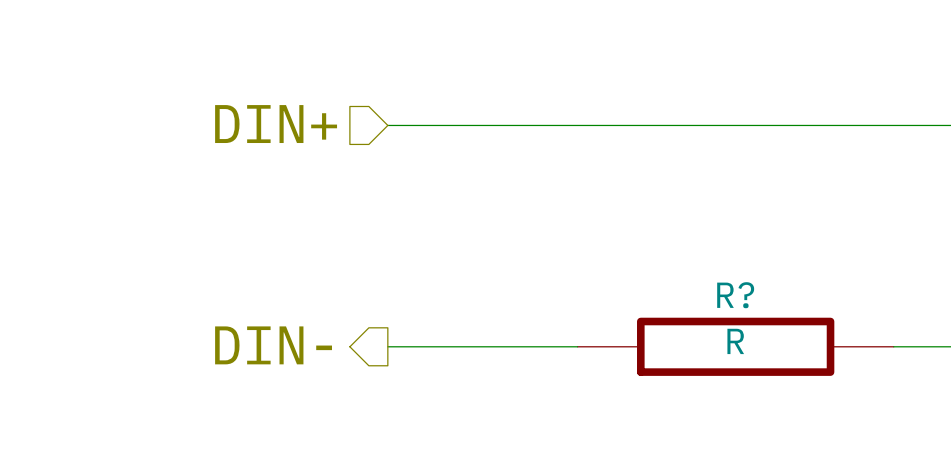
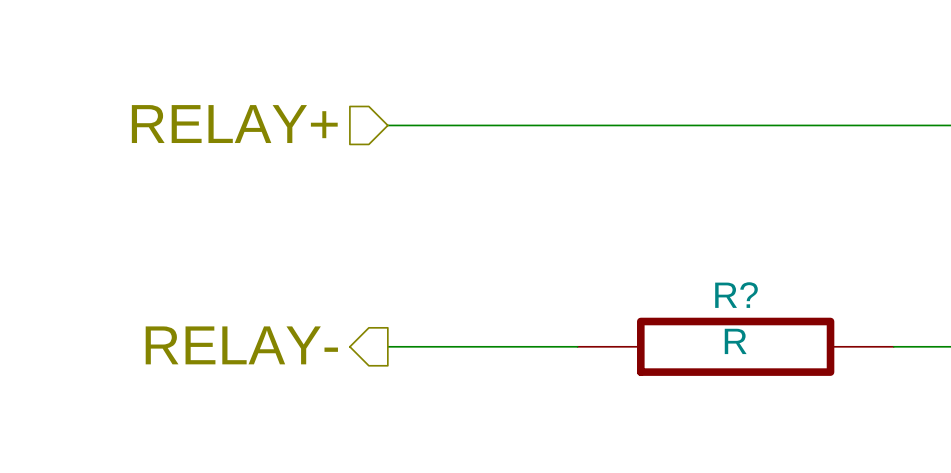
hierarchical label: DIN+ (276, 124) -> RELAY+ (234, 124)
hierarchical label: DIN- (273, 345) -> RELAY- (241, 345)

